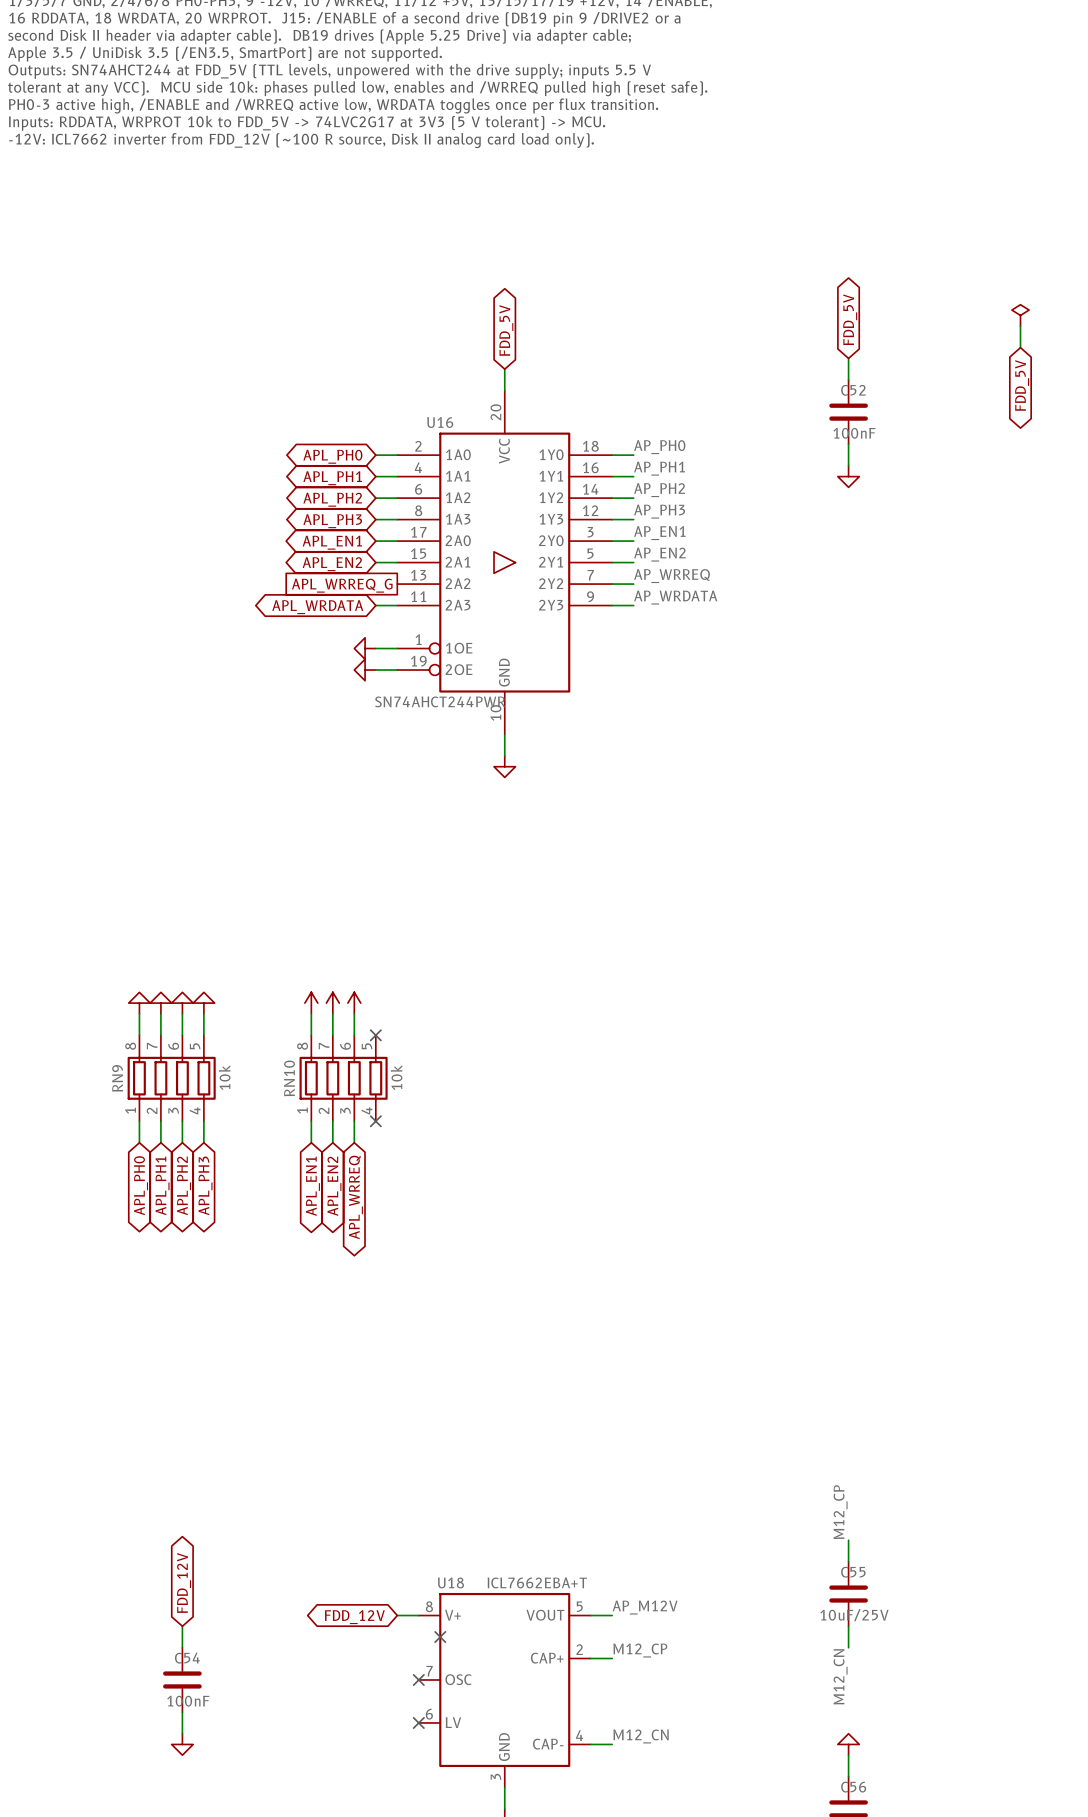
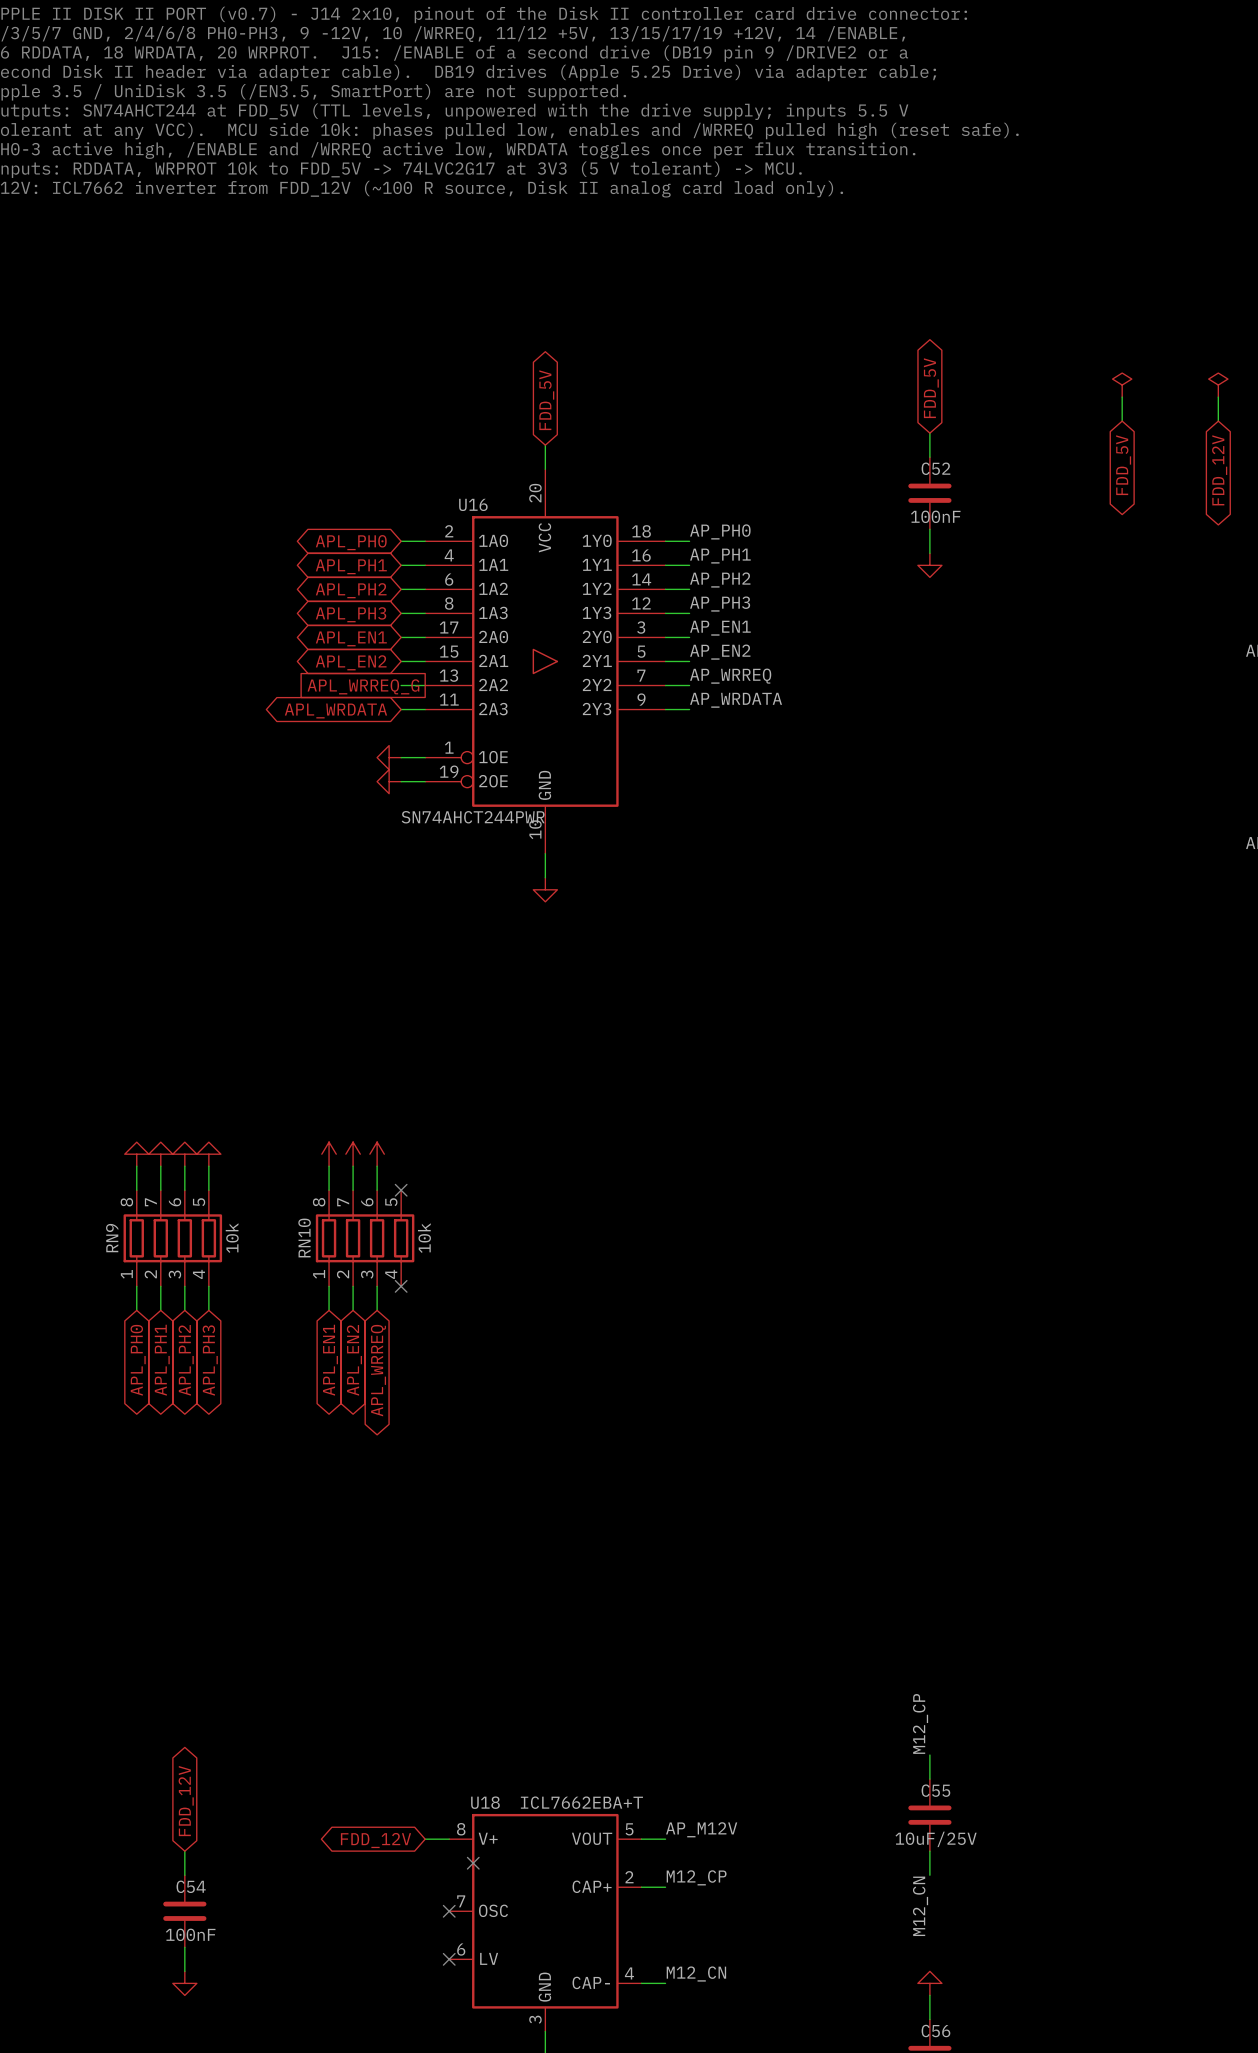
wire: none -> (401, 685) (425, 685)

